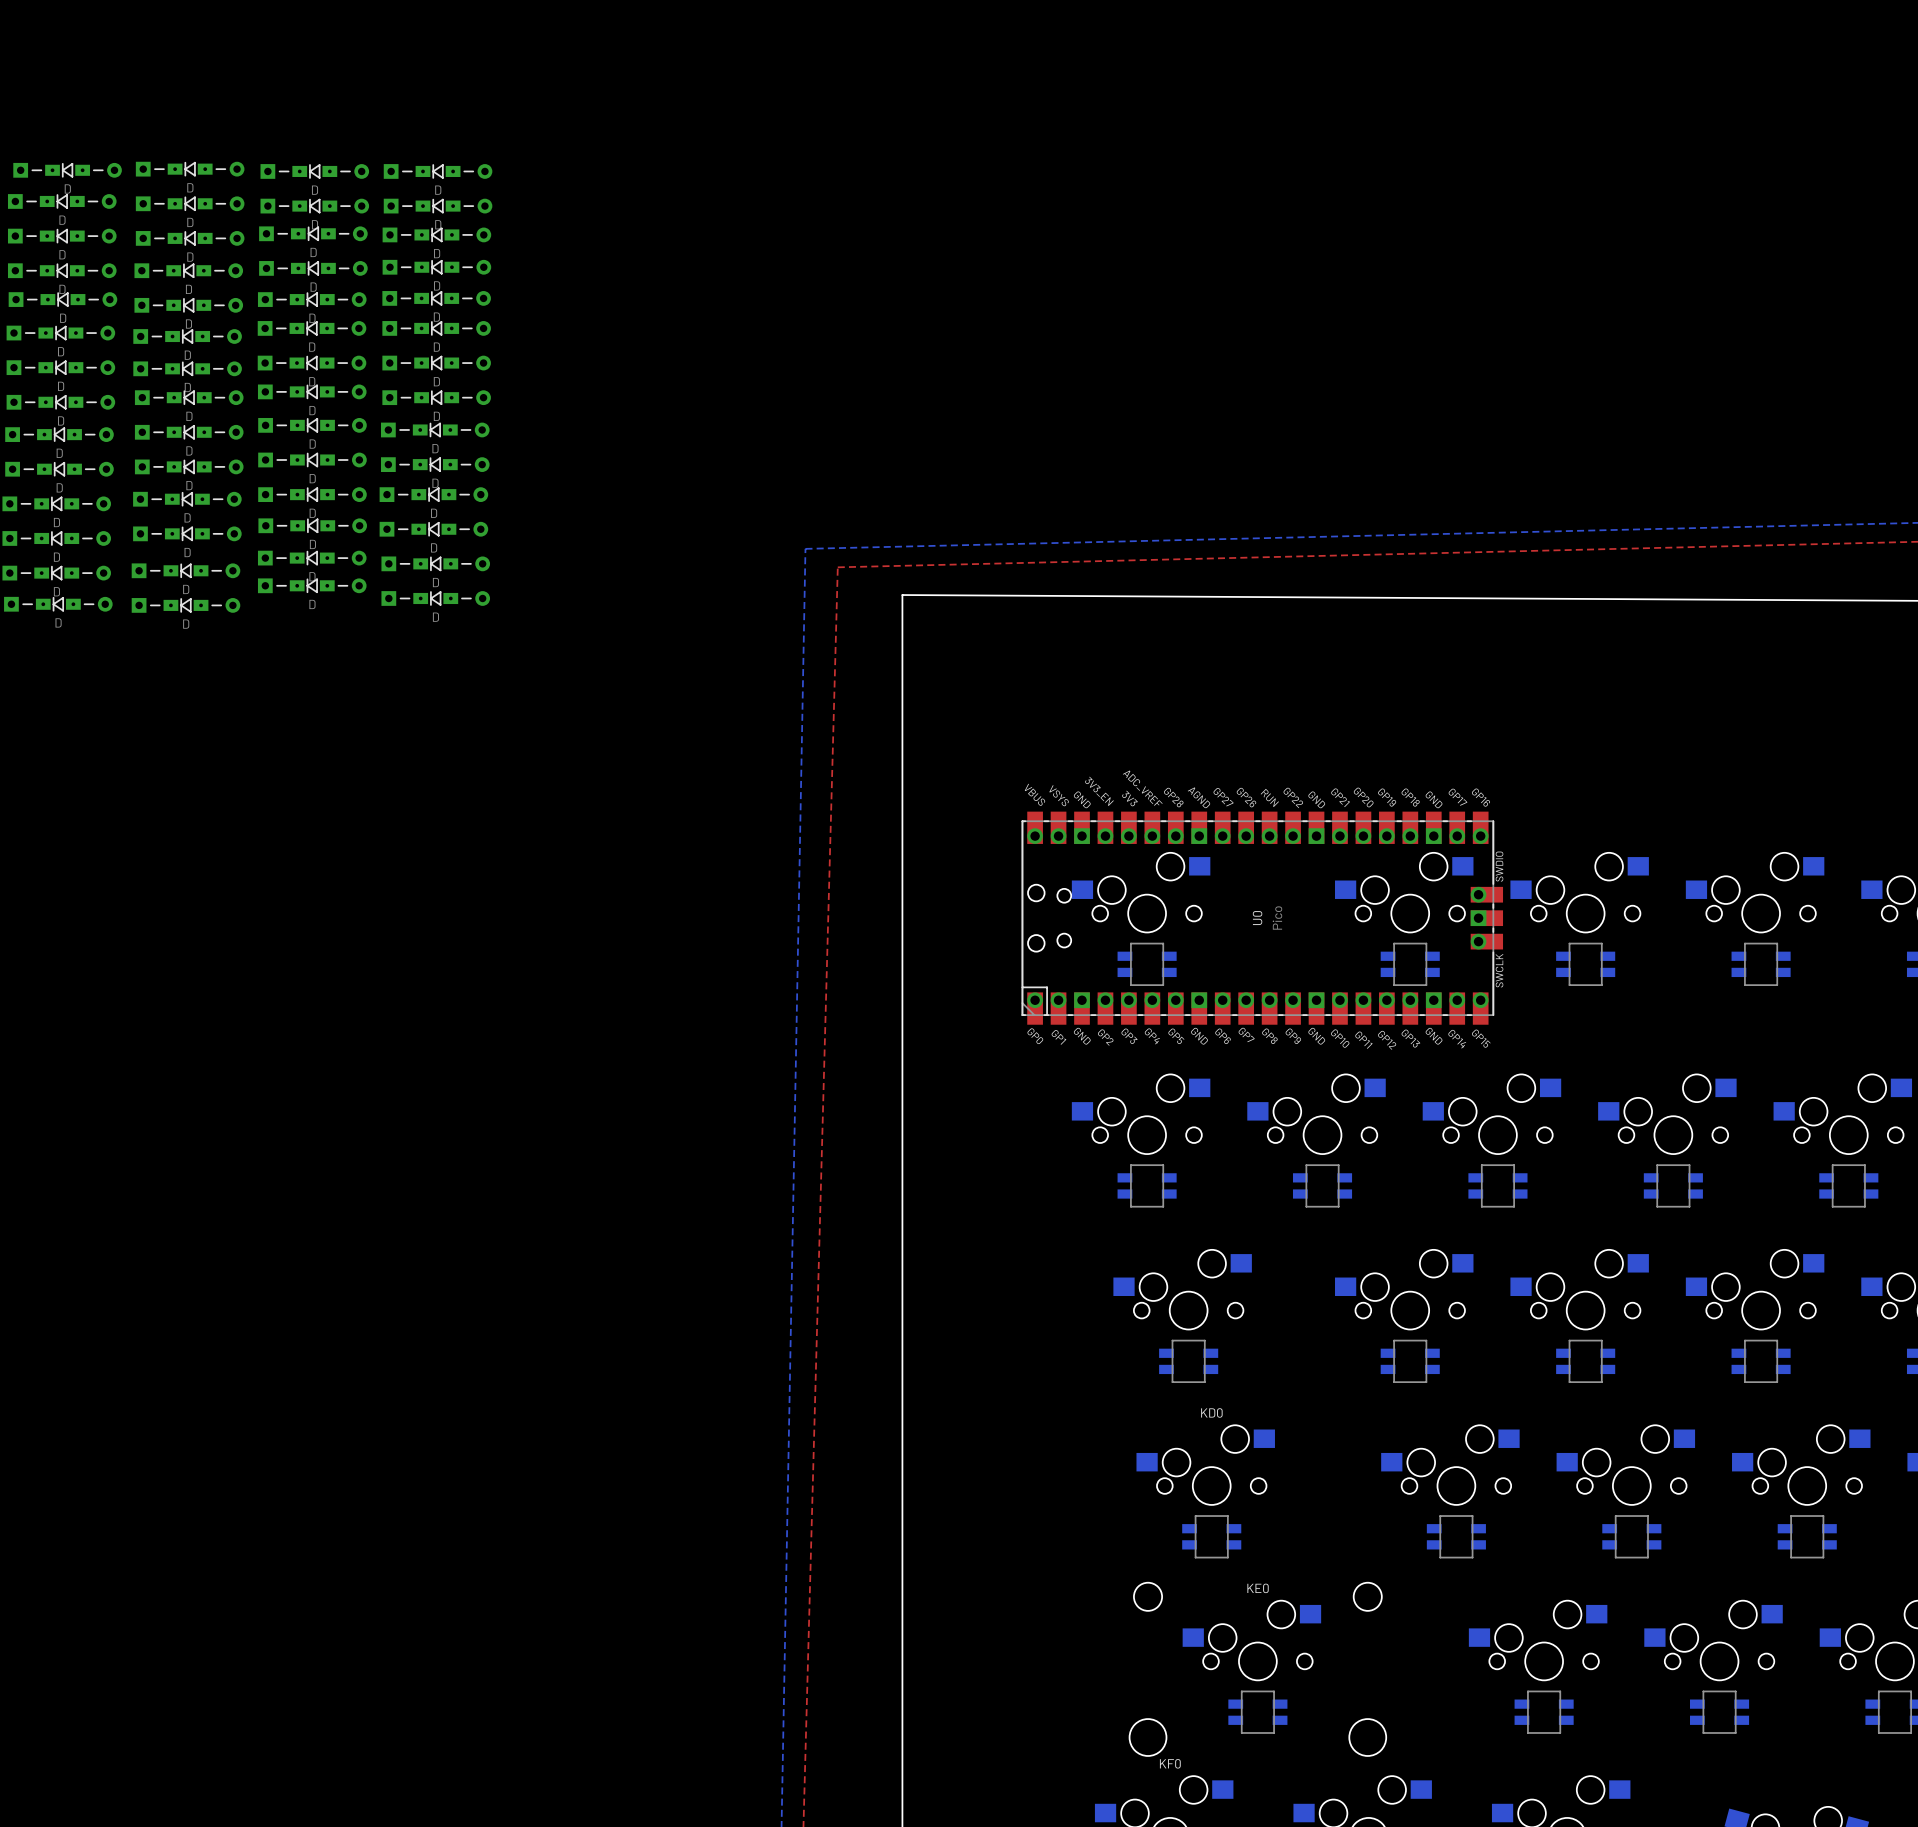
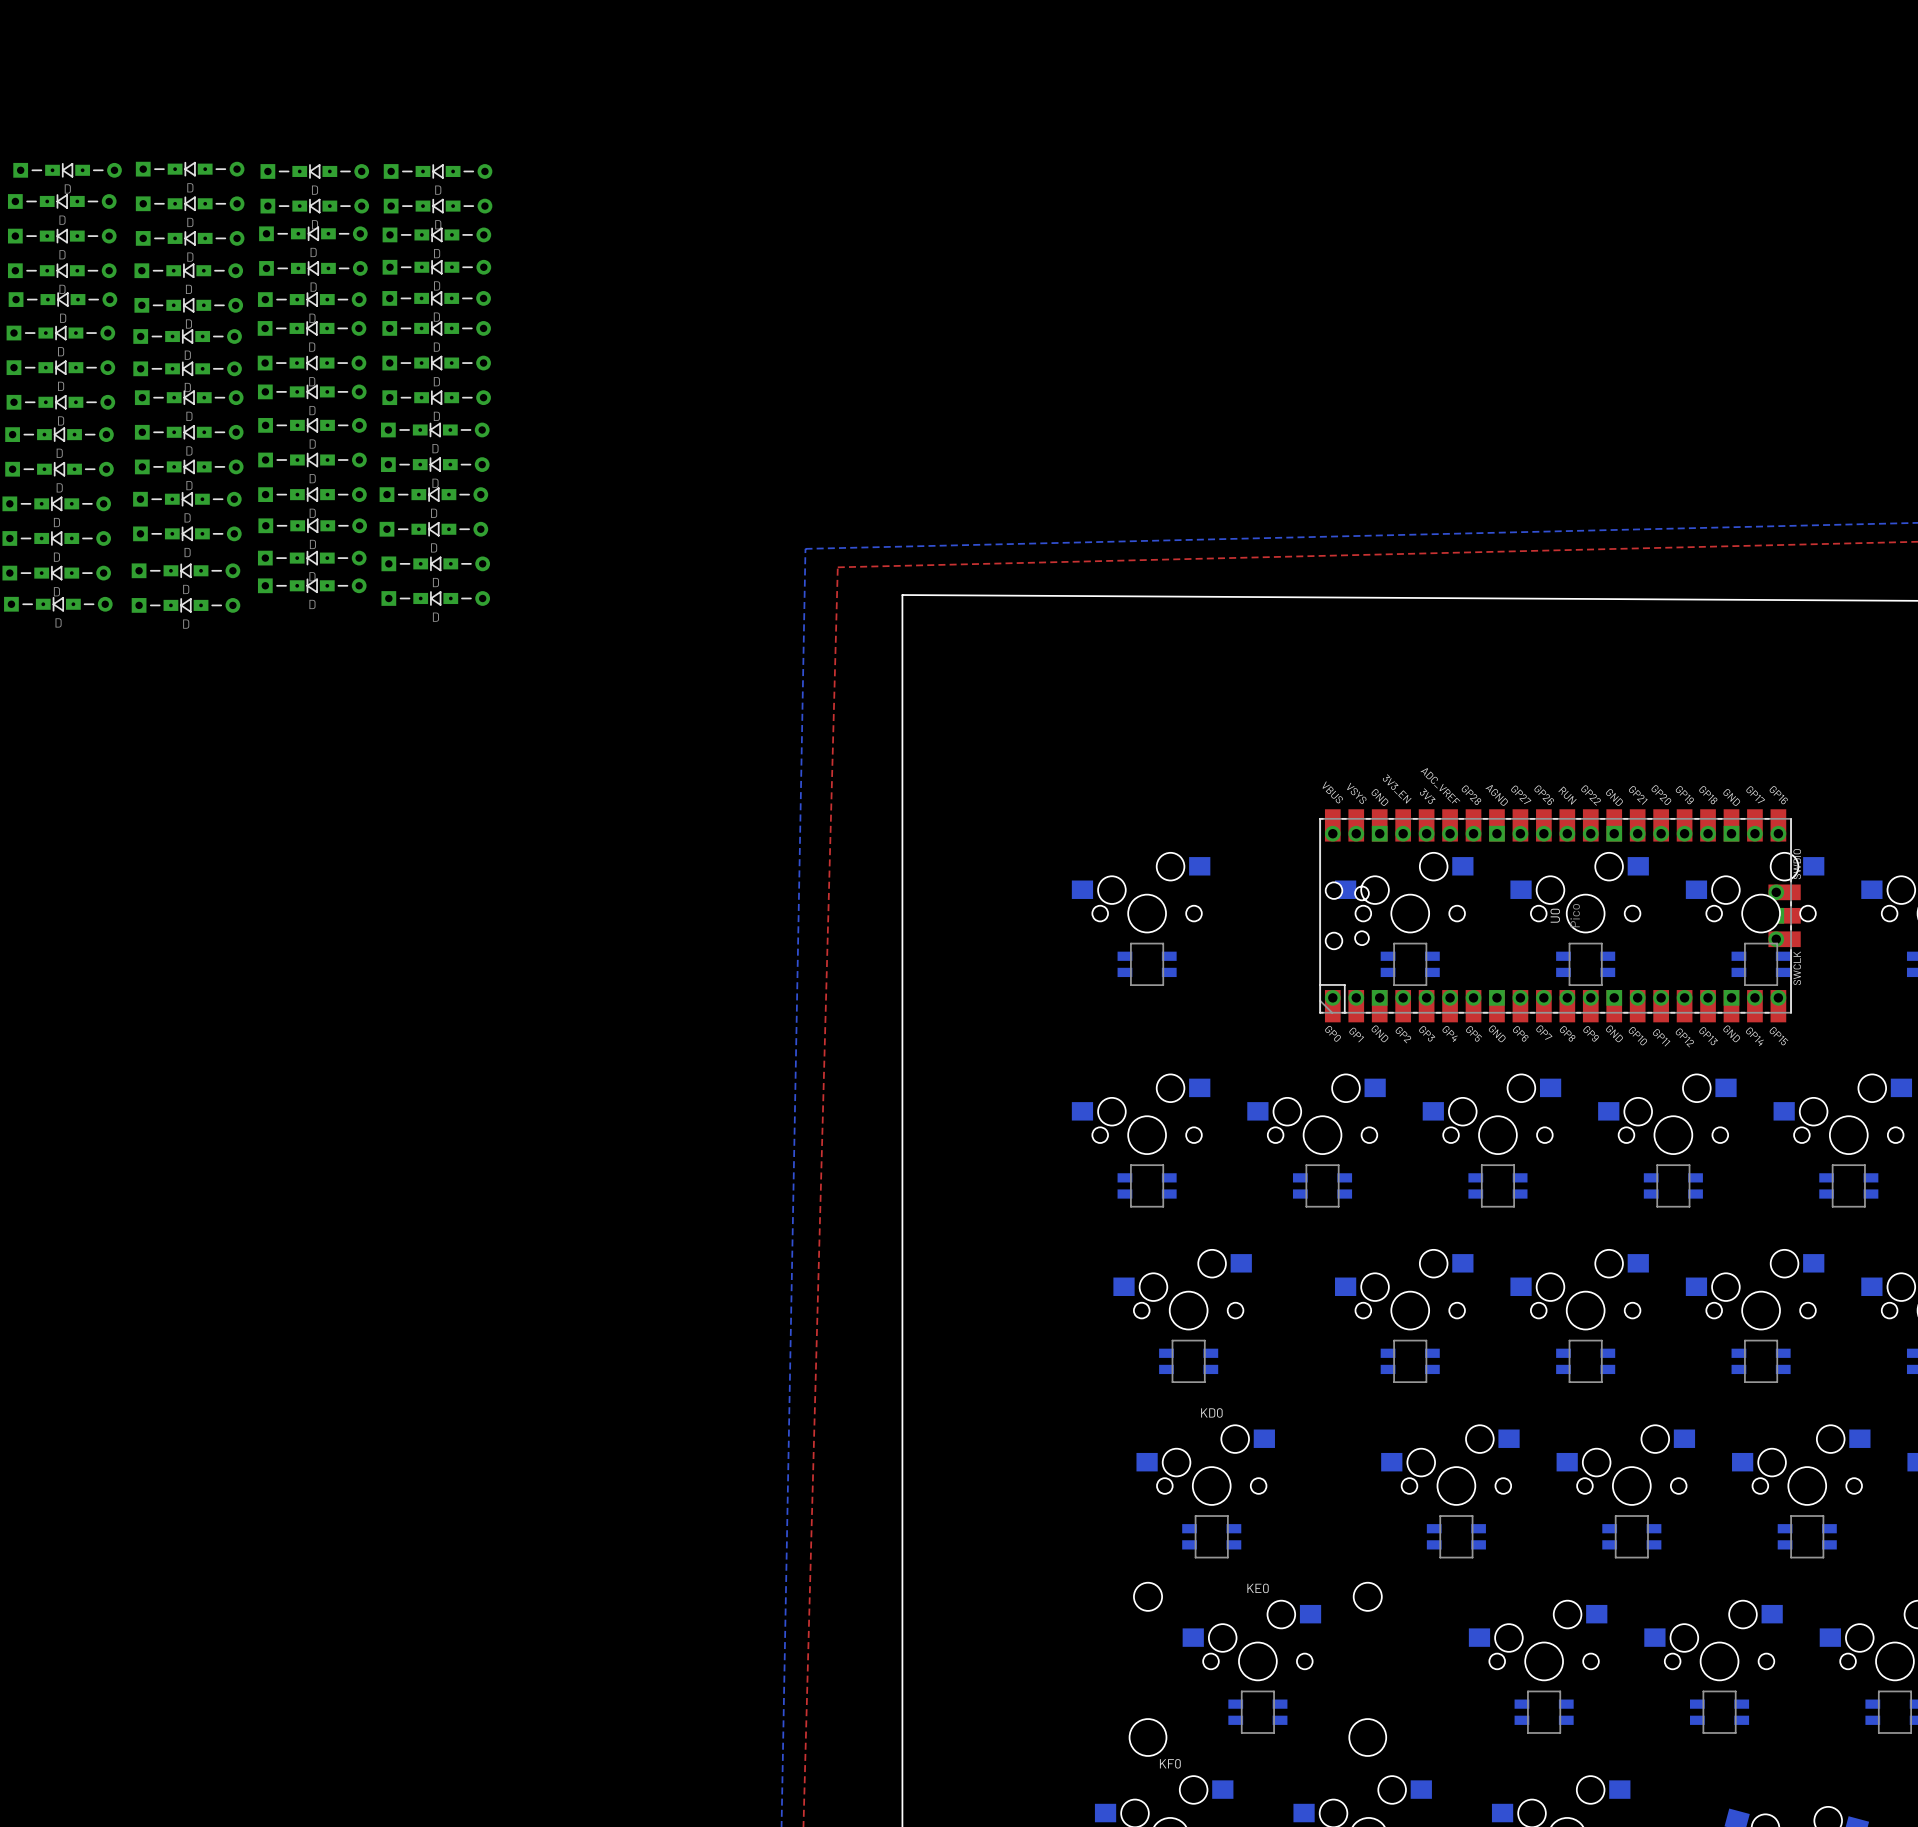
U0 position: (1262, 918) -> (1560, 915)

